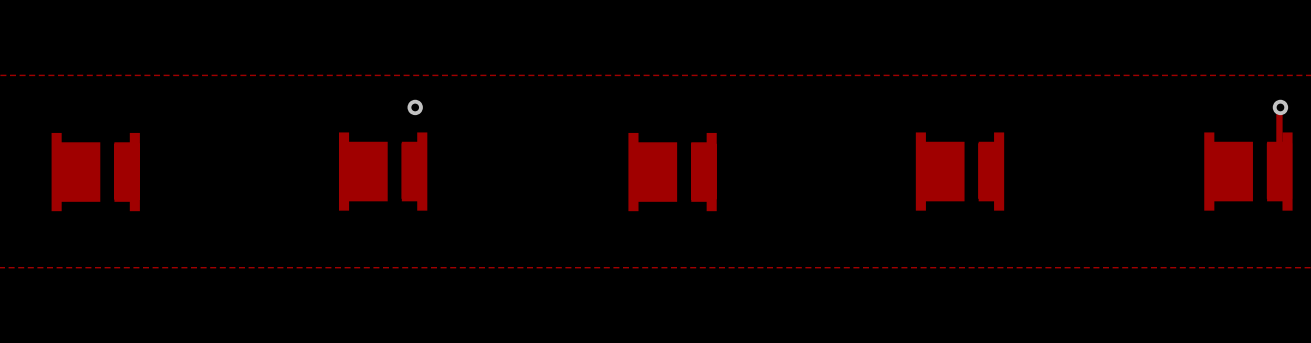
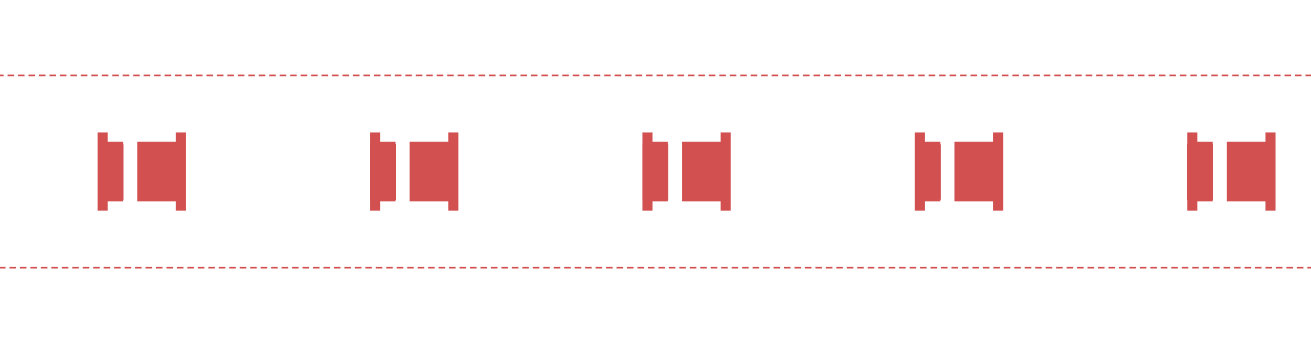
via: (415, 107) -> none
top track: (1280, 107) (1279, 171) -> none
via: (1280, 107) -> none
part rotation: 0° (383, 171) -> 180° (414, 171)
part rotation: 0° (959, 171) -> 180° (958, 171)
part rotation: 0° (1248, 171) -> 180° (1231, 171)
part rotation: 0° (95, 172) -> 180° (141, 171)
part rotation: 0° (672, 172) -> 180° (686, 171)

